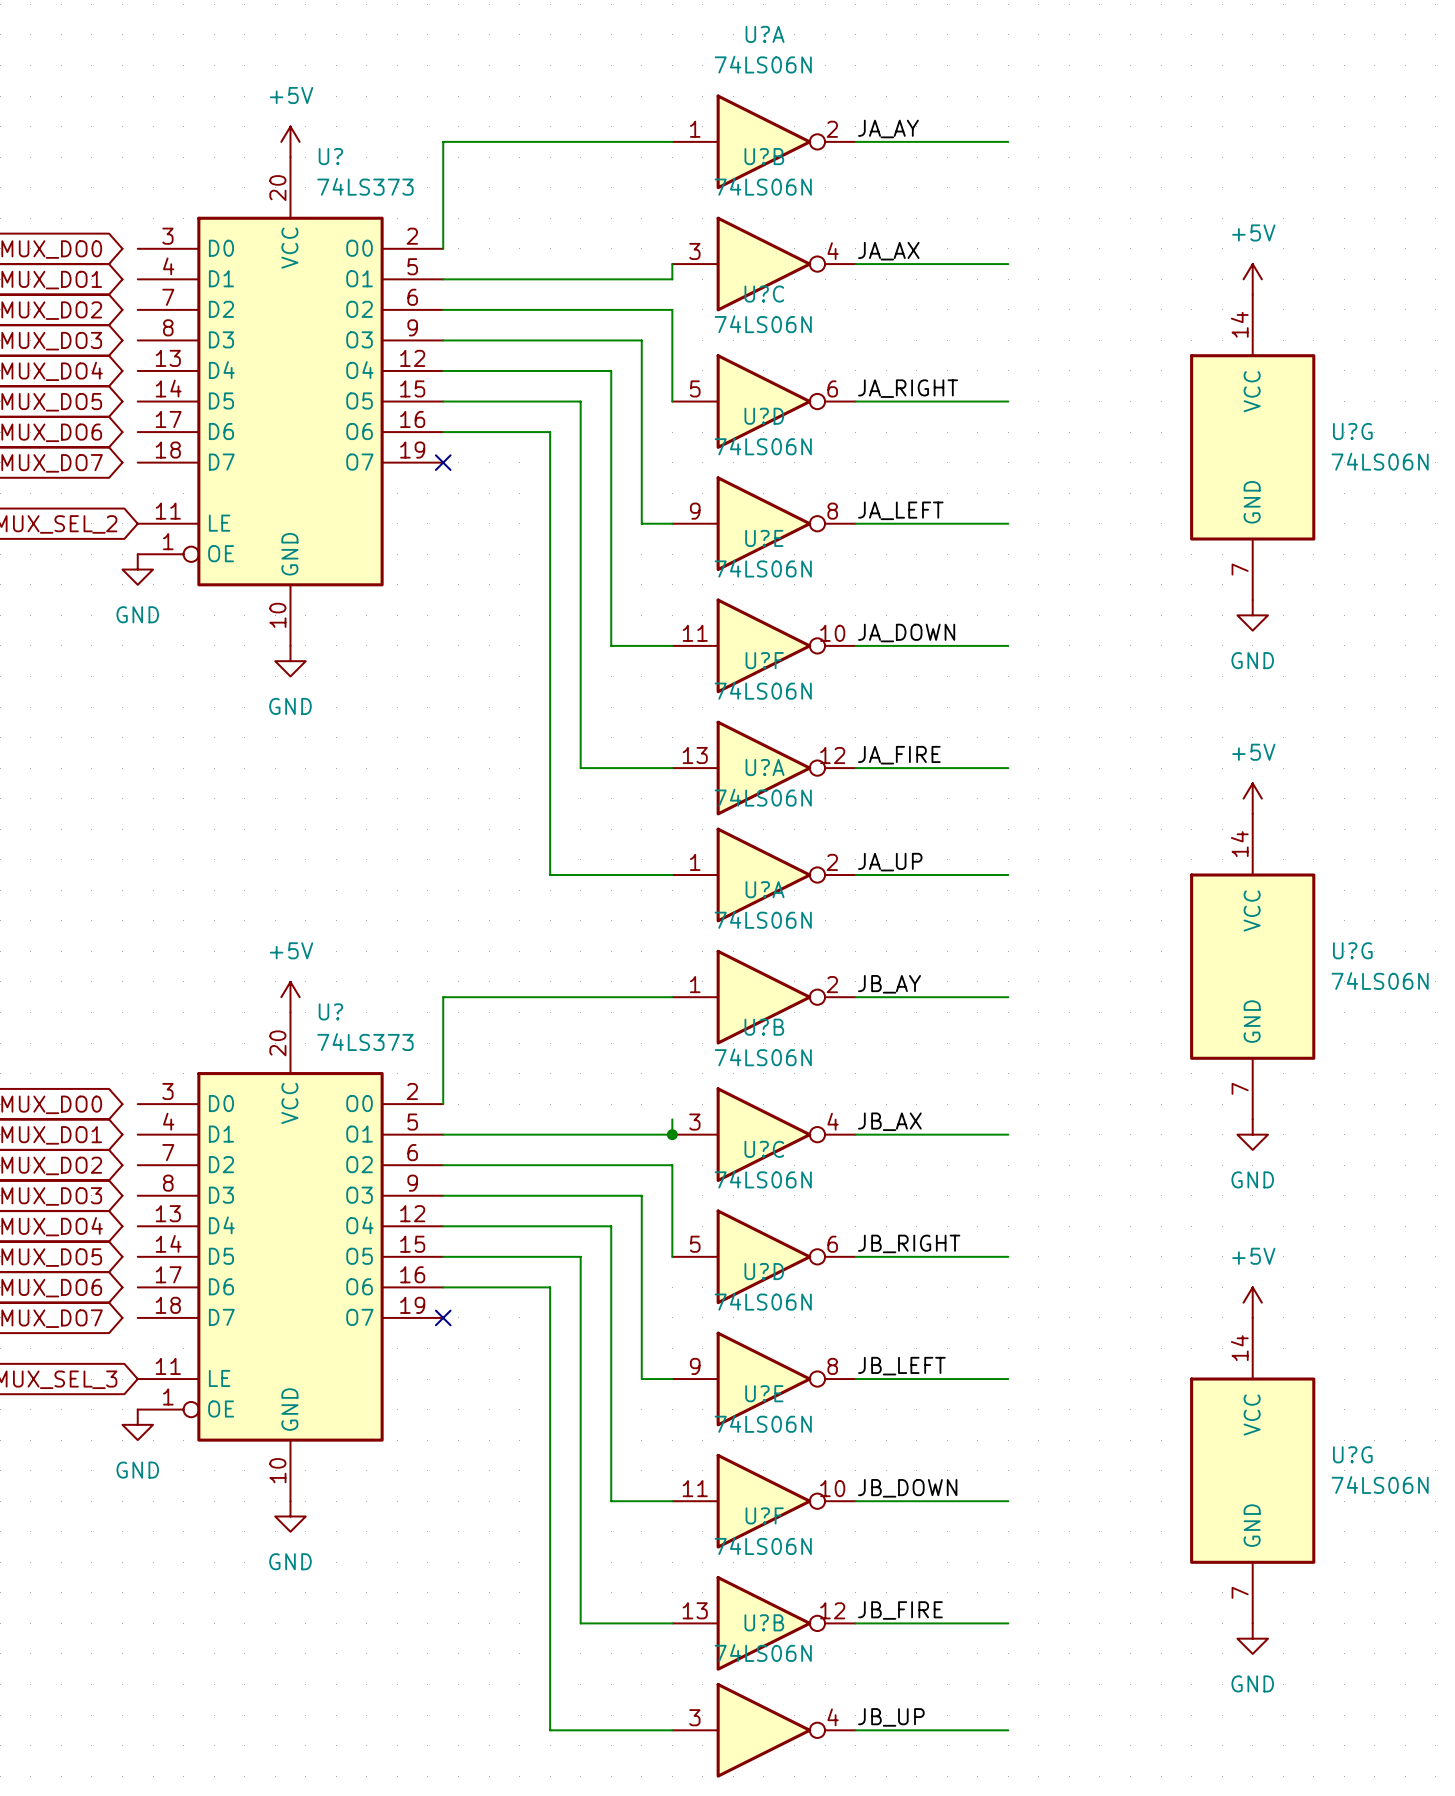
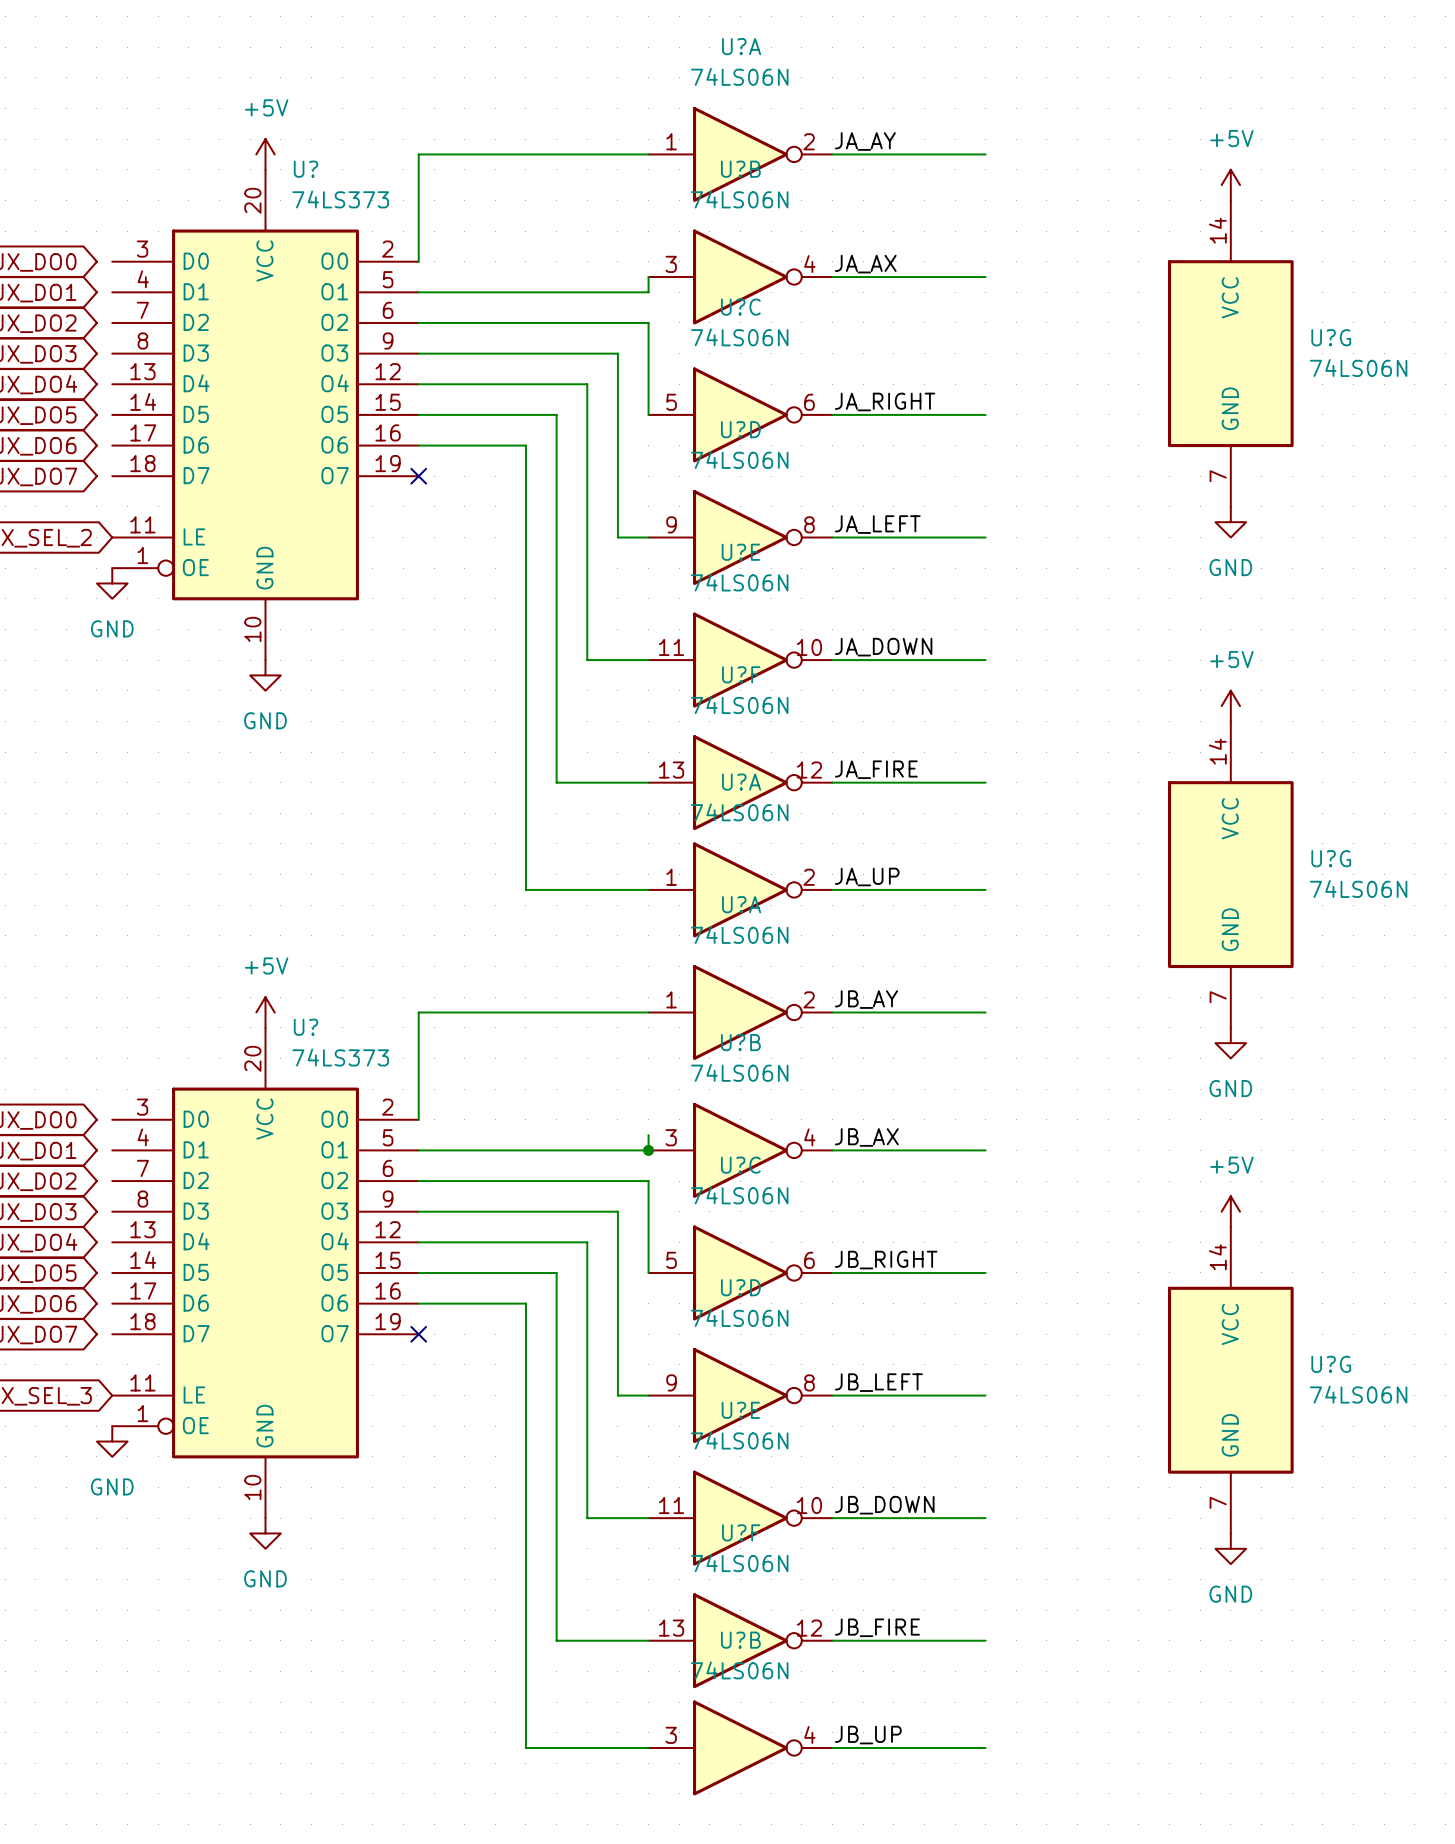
power symbol position: +5V (1252, 279) -> +5V (1230, 185)
U?G position: (1252, 447) -> (1230, 353)
power symbol position: GND (1252, 615) -> GND (1230, 522)
power symbol position: +5V (1252, 798) -> +5V (1230, 706)
U?G position: (1252, 966) -> (1230, 874)
power symbol position: GND (1252, 1134) -> GND (1230, 1043)
power symbol position: +5V (1252, 1302) -> +5V (1230, 1211)
U?G position: (1252, 1470) -> (1230, 1380)
power symbol position: GND (1252, 1638) -> GND (1230, 1548)

